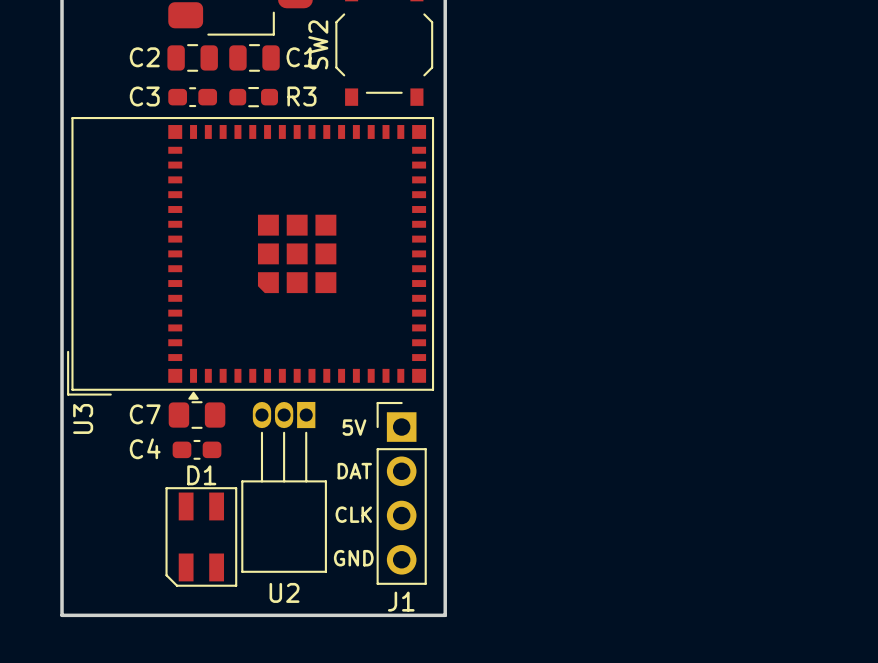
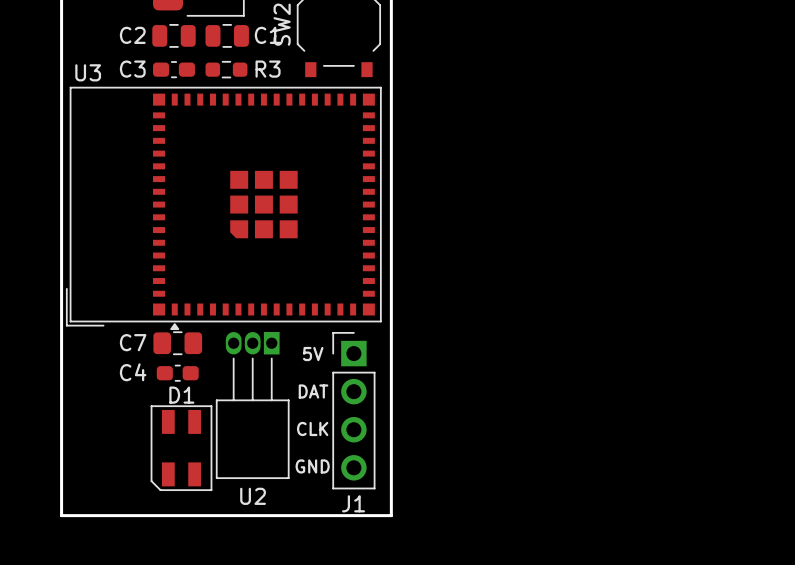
U3 name rotation: 0° (83, 418) -> 90° clockwise (88, 72)
U3 name position: U3 (83, 418) -> U3 (88, 72)

